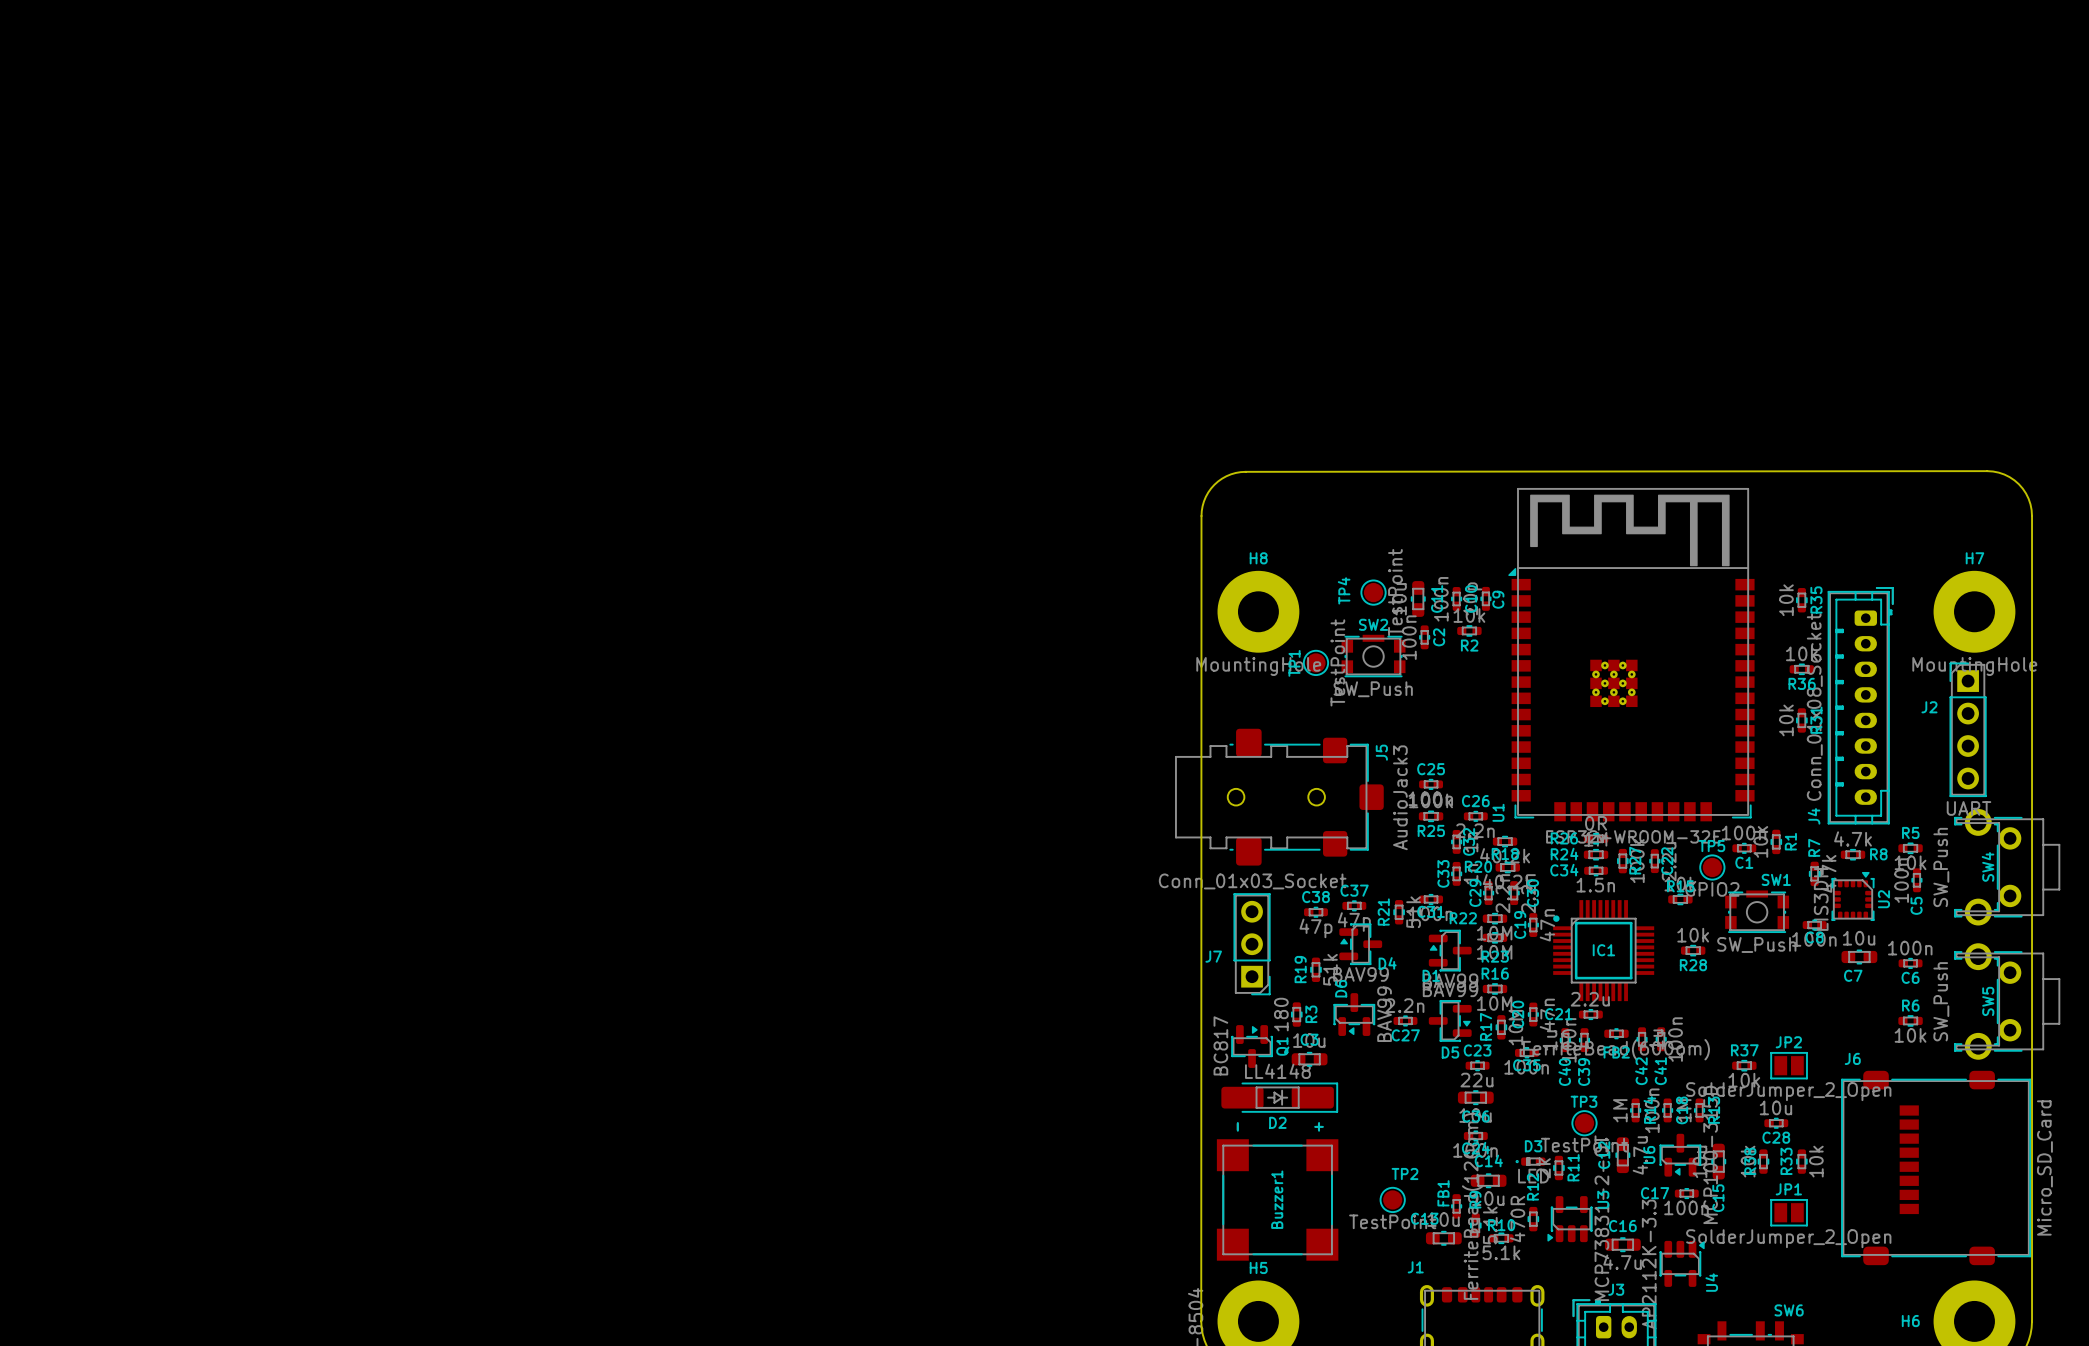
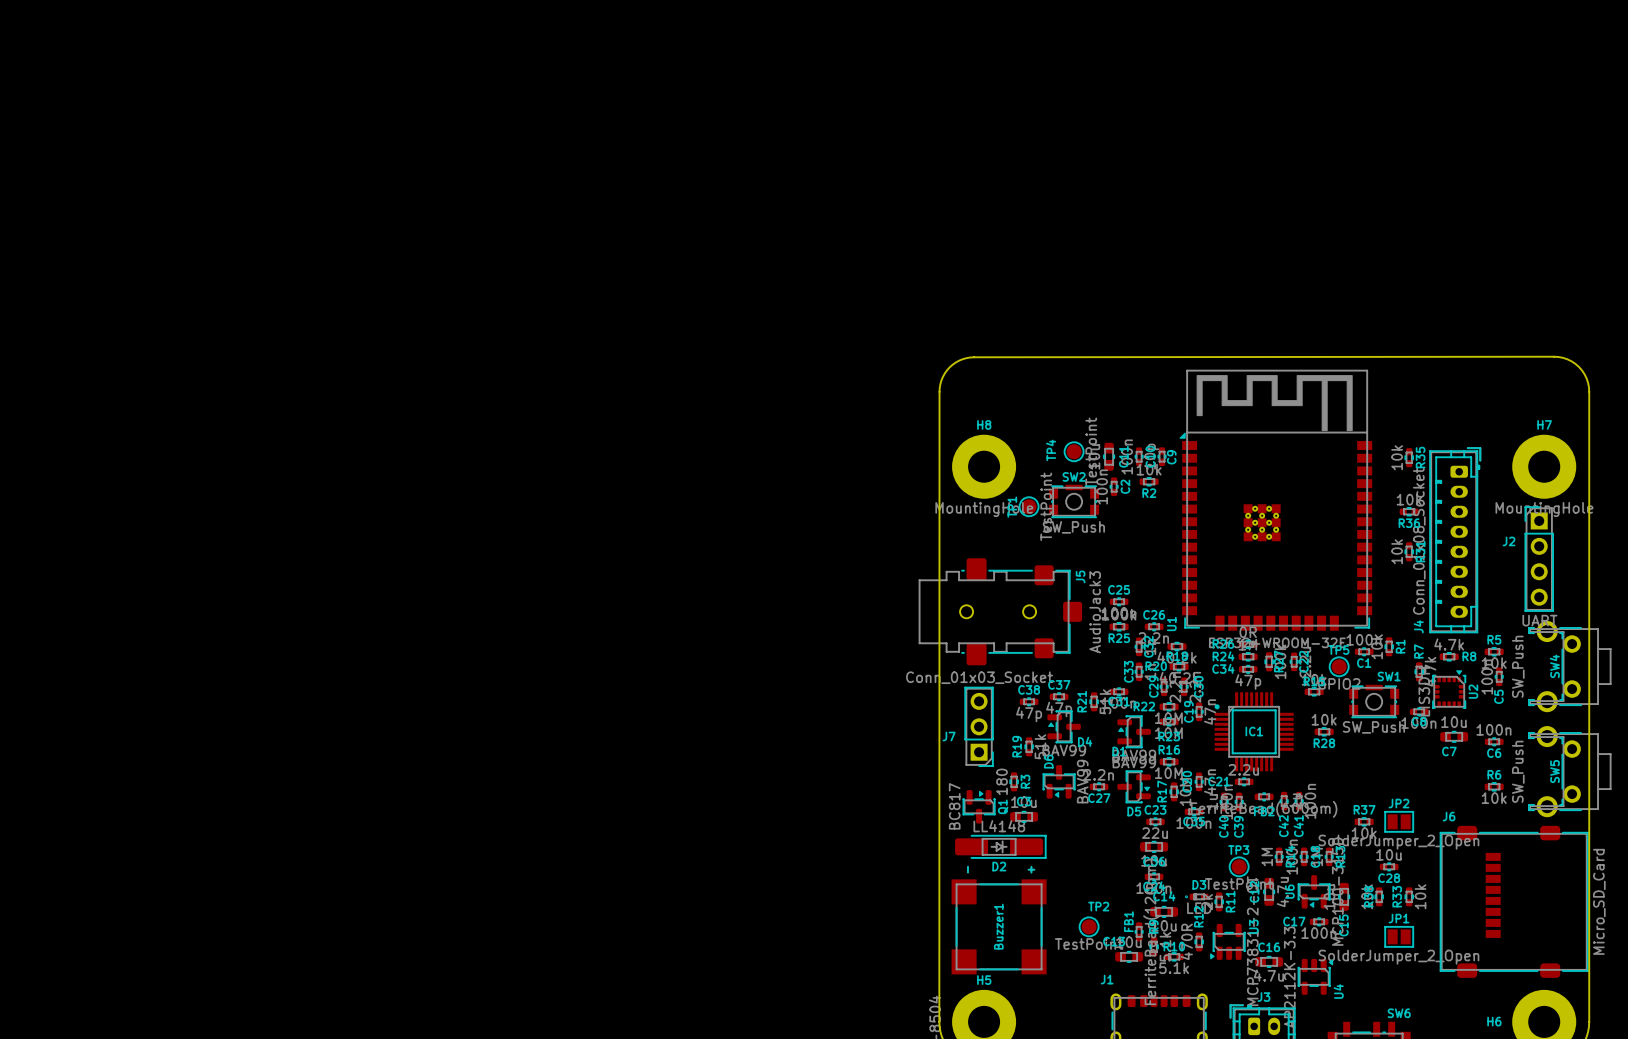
C34 value: 1.5n (1595, 885) -> 47p (1248, 682)

